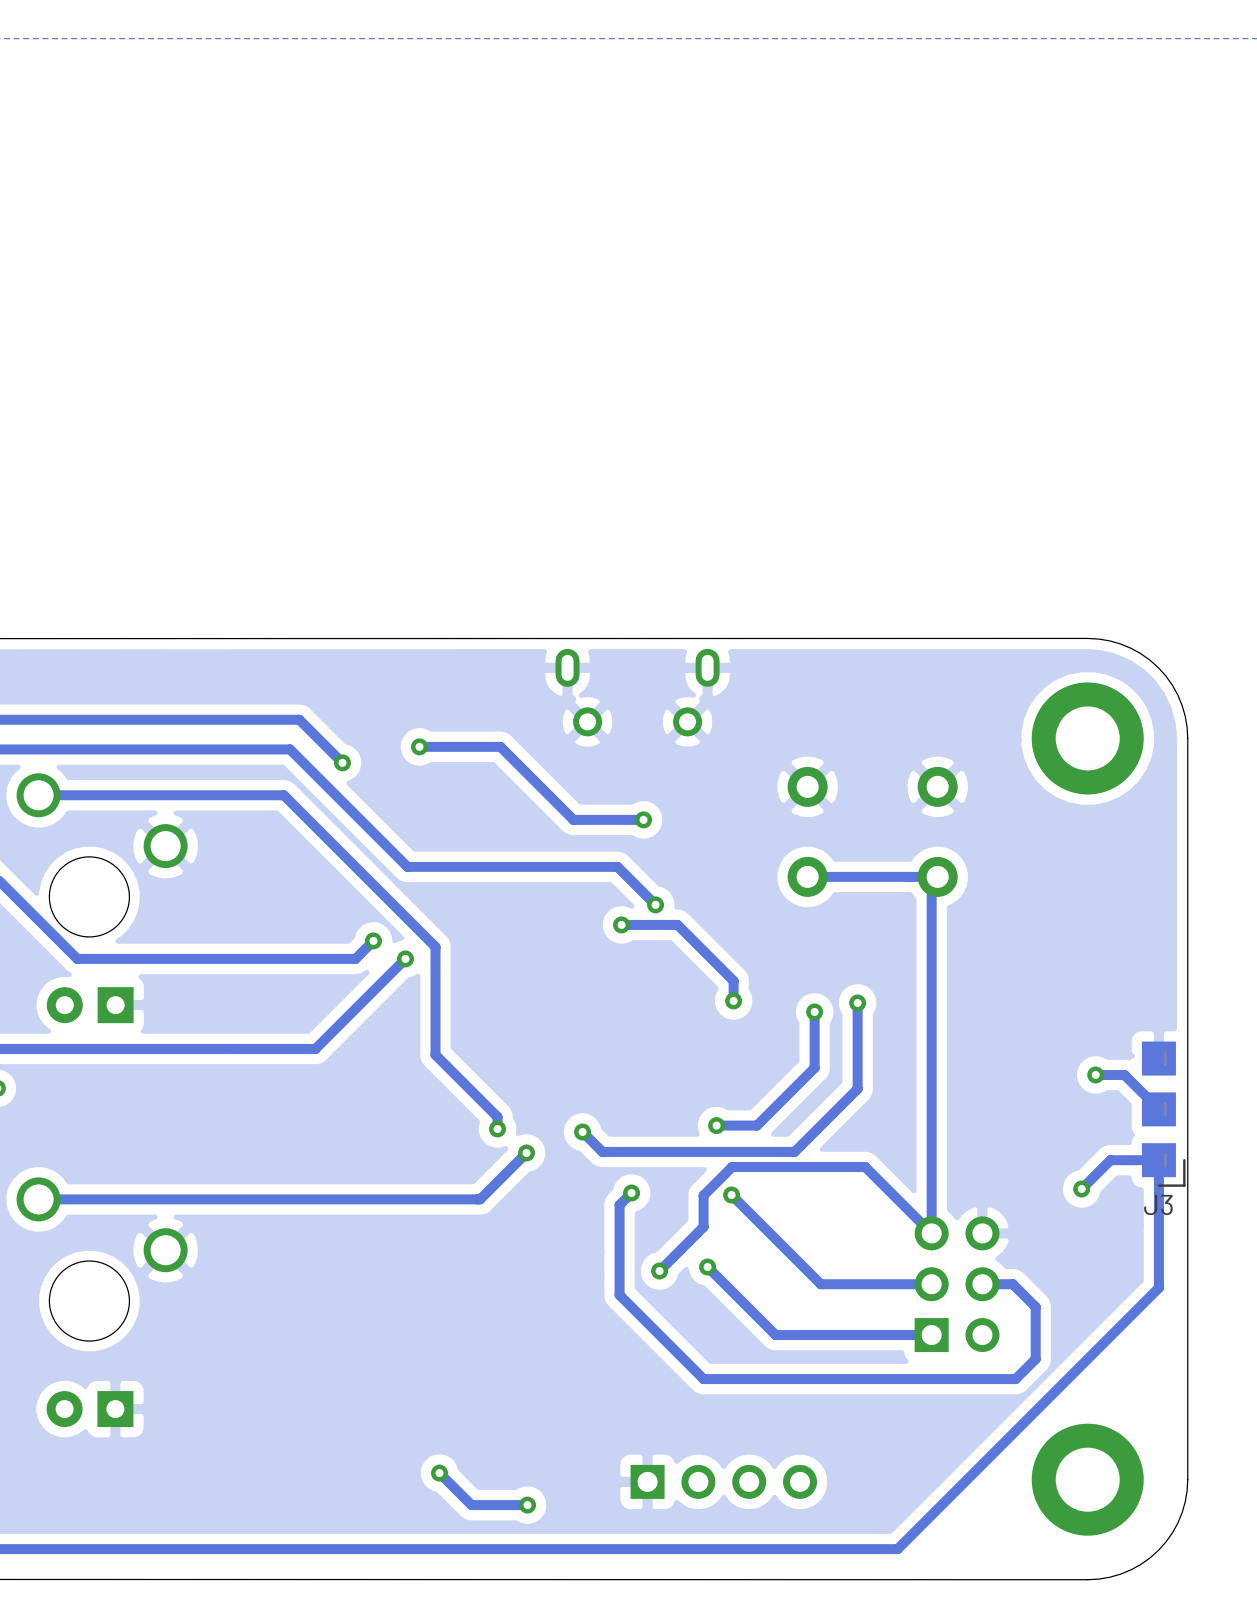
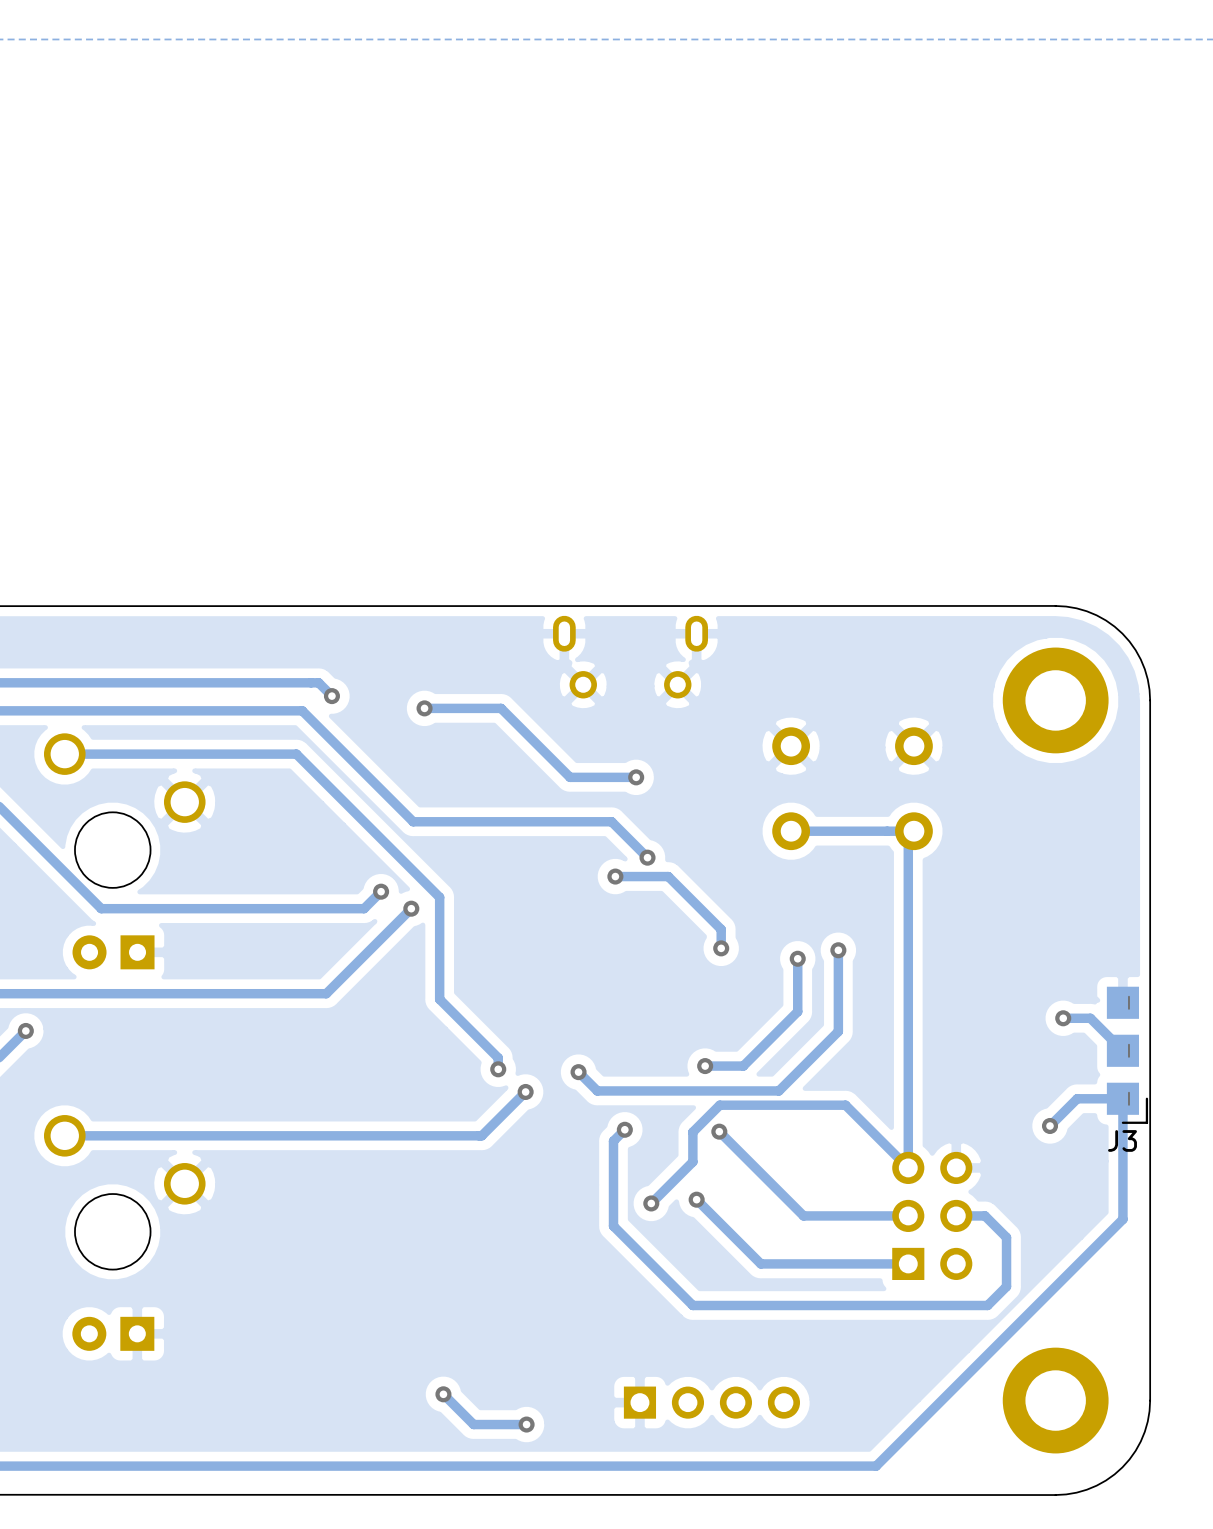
track: (299, 719) (342, 762) -> (311, 682) (318, 682) (331, 696)
via position: (342, 762) -> (331, 696)

